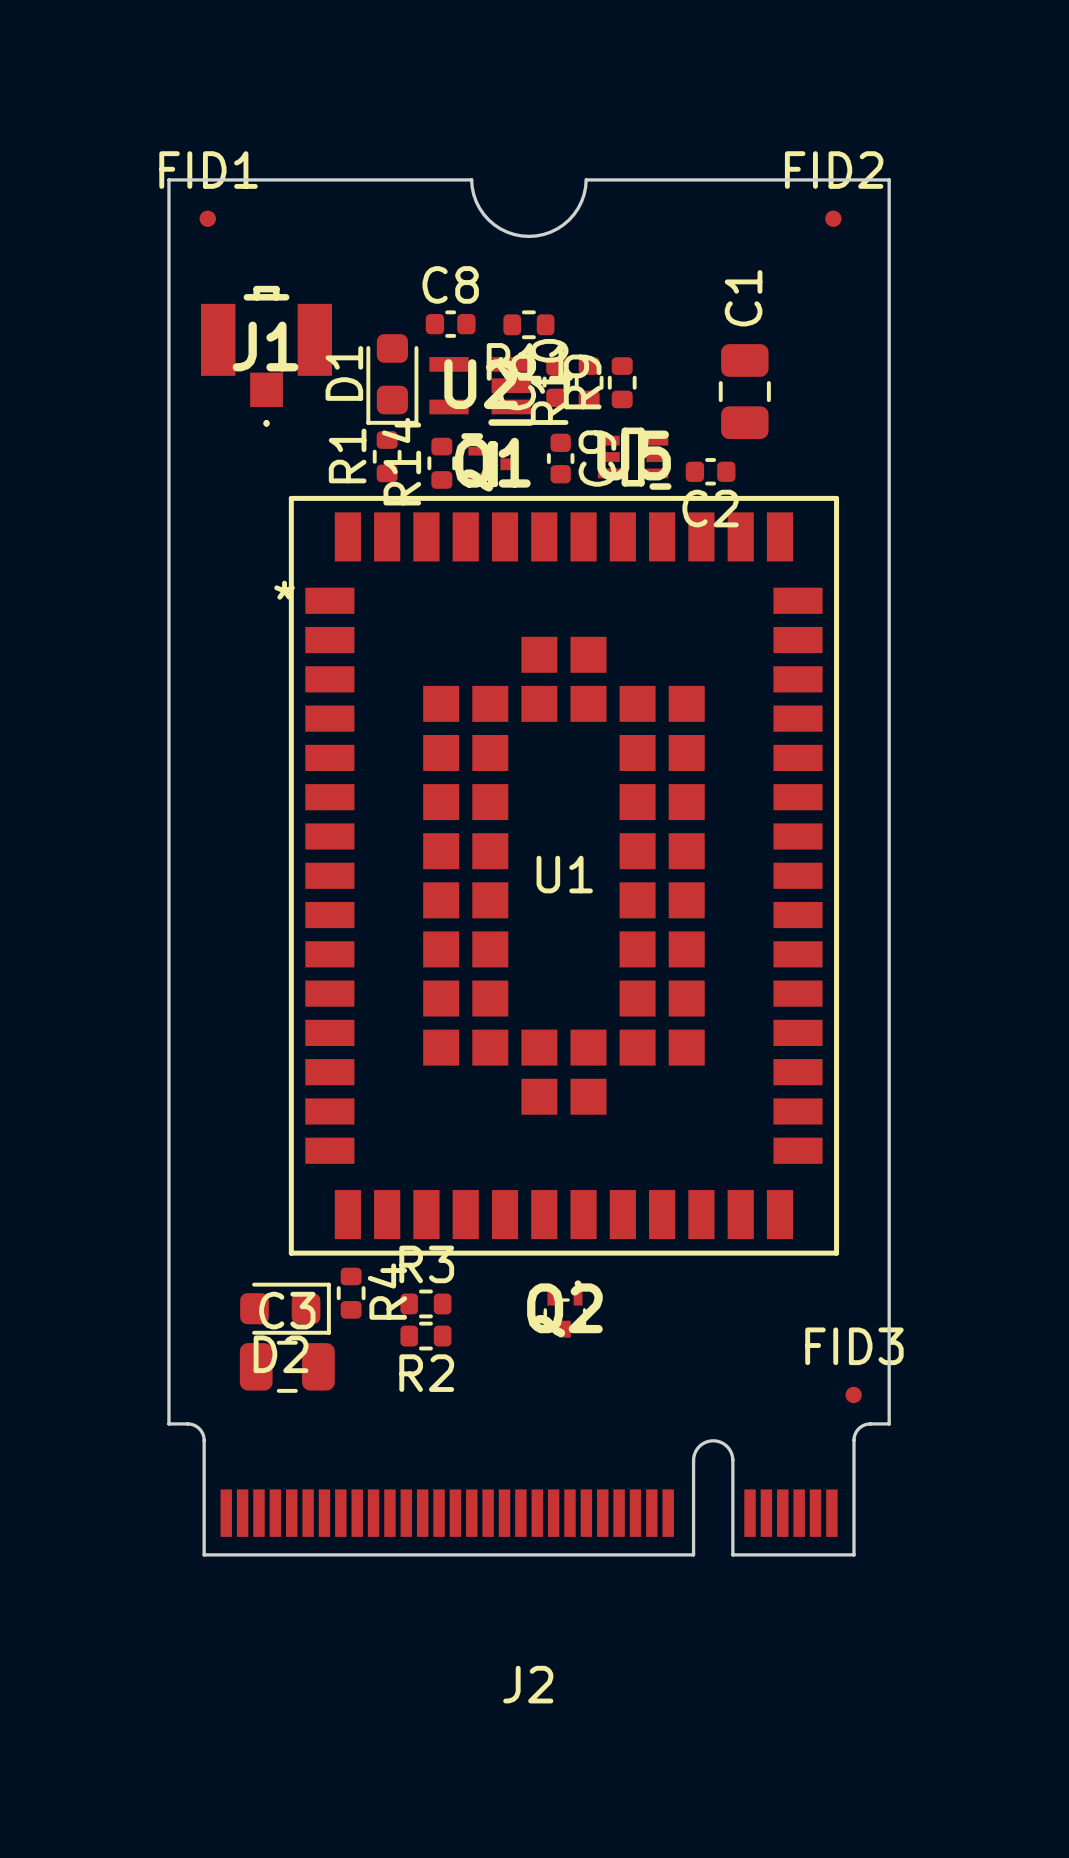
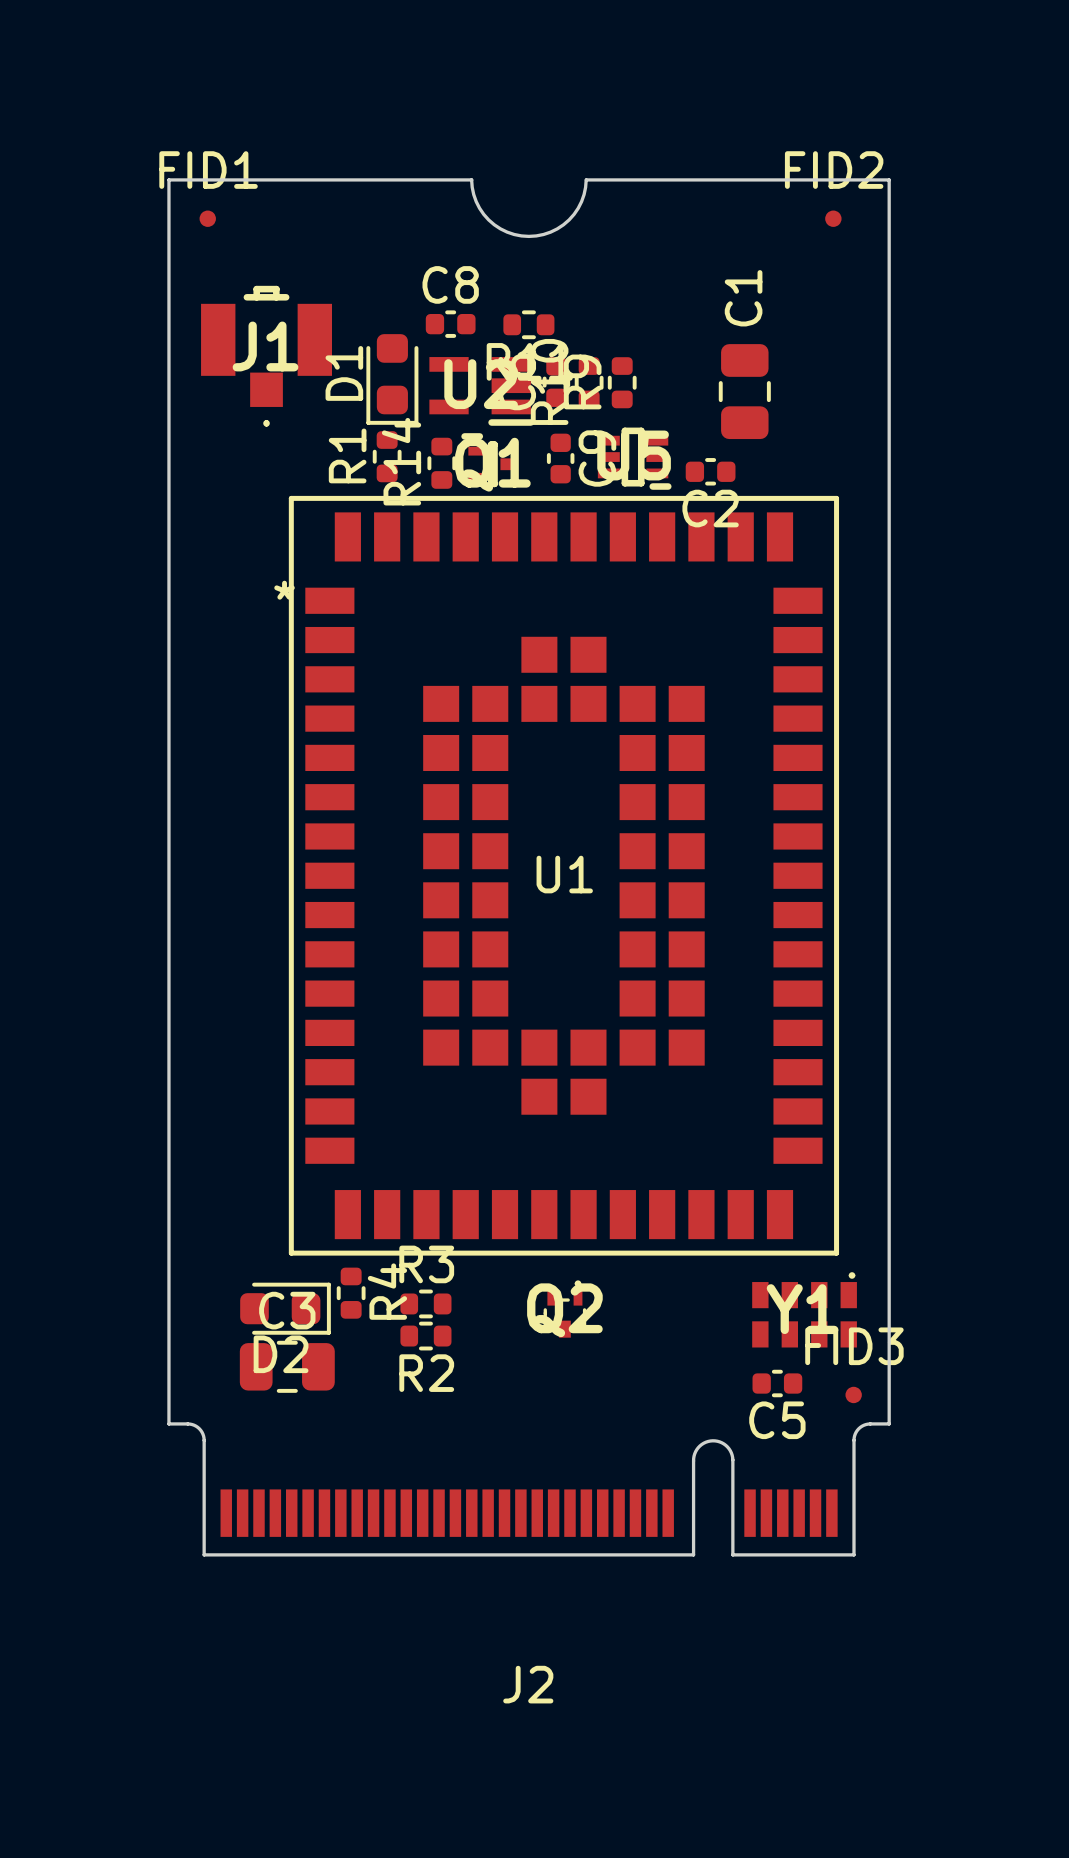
Y1: none -> (804, 1309)
C5: none -> (777, 1383)

